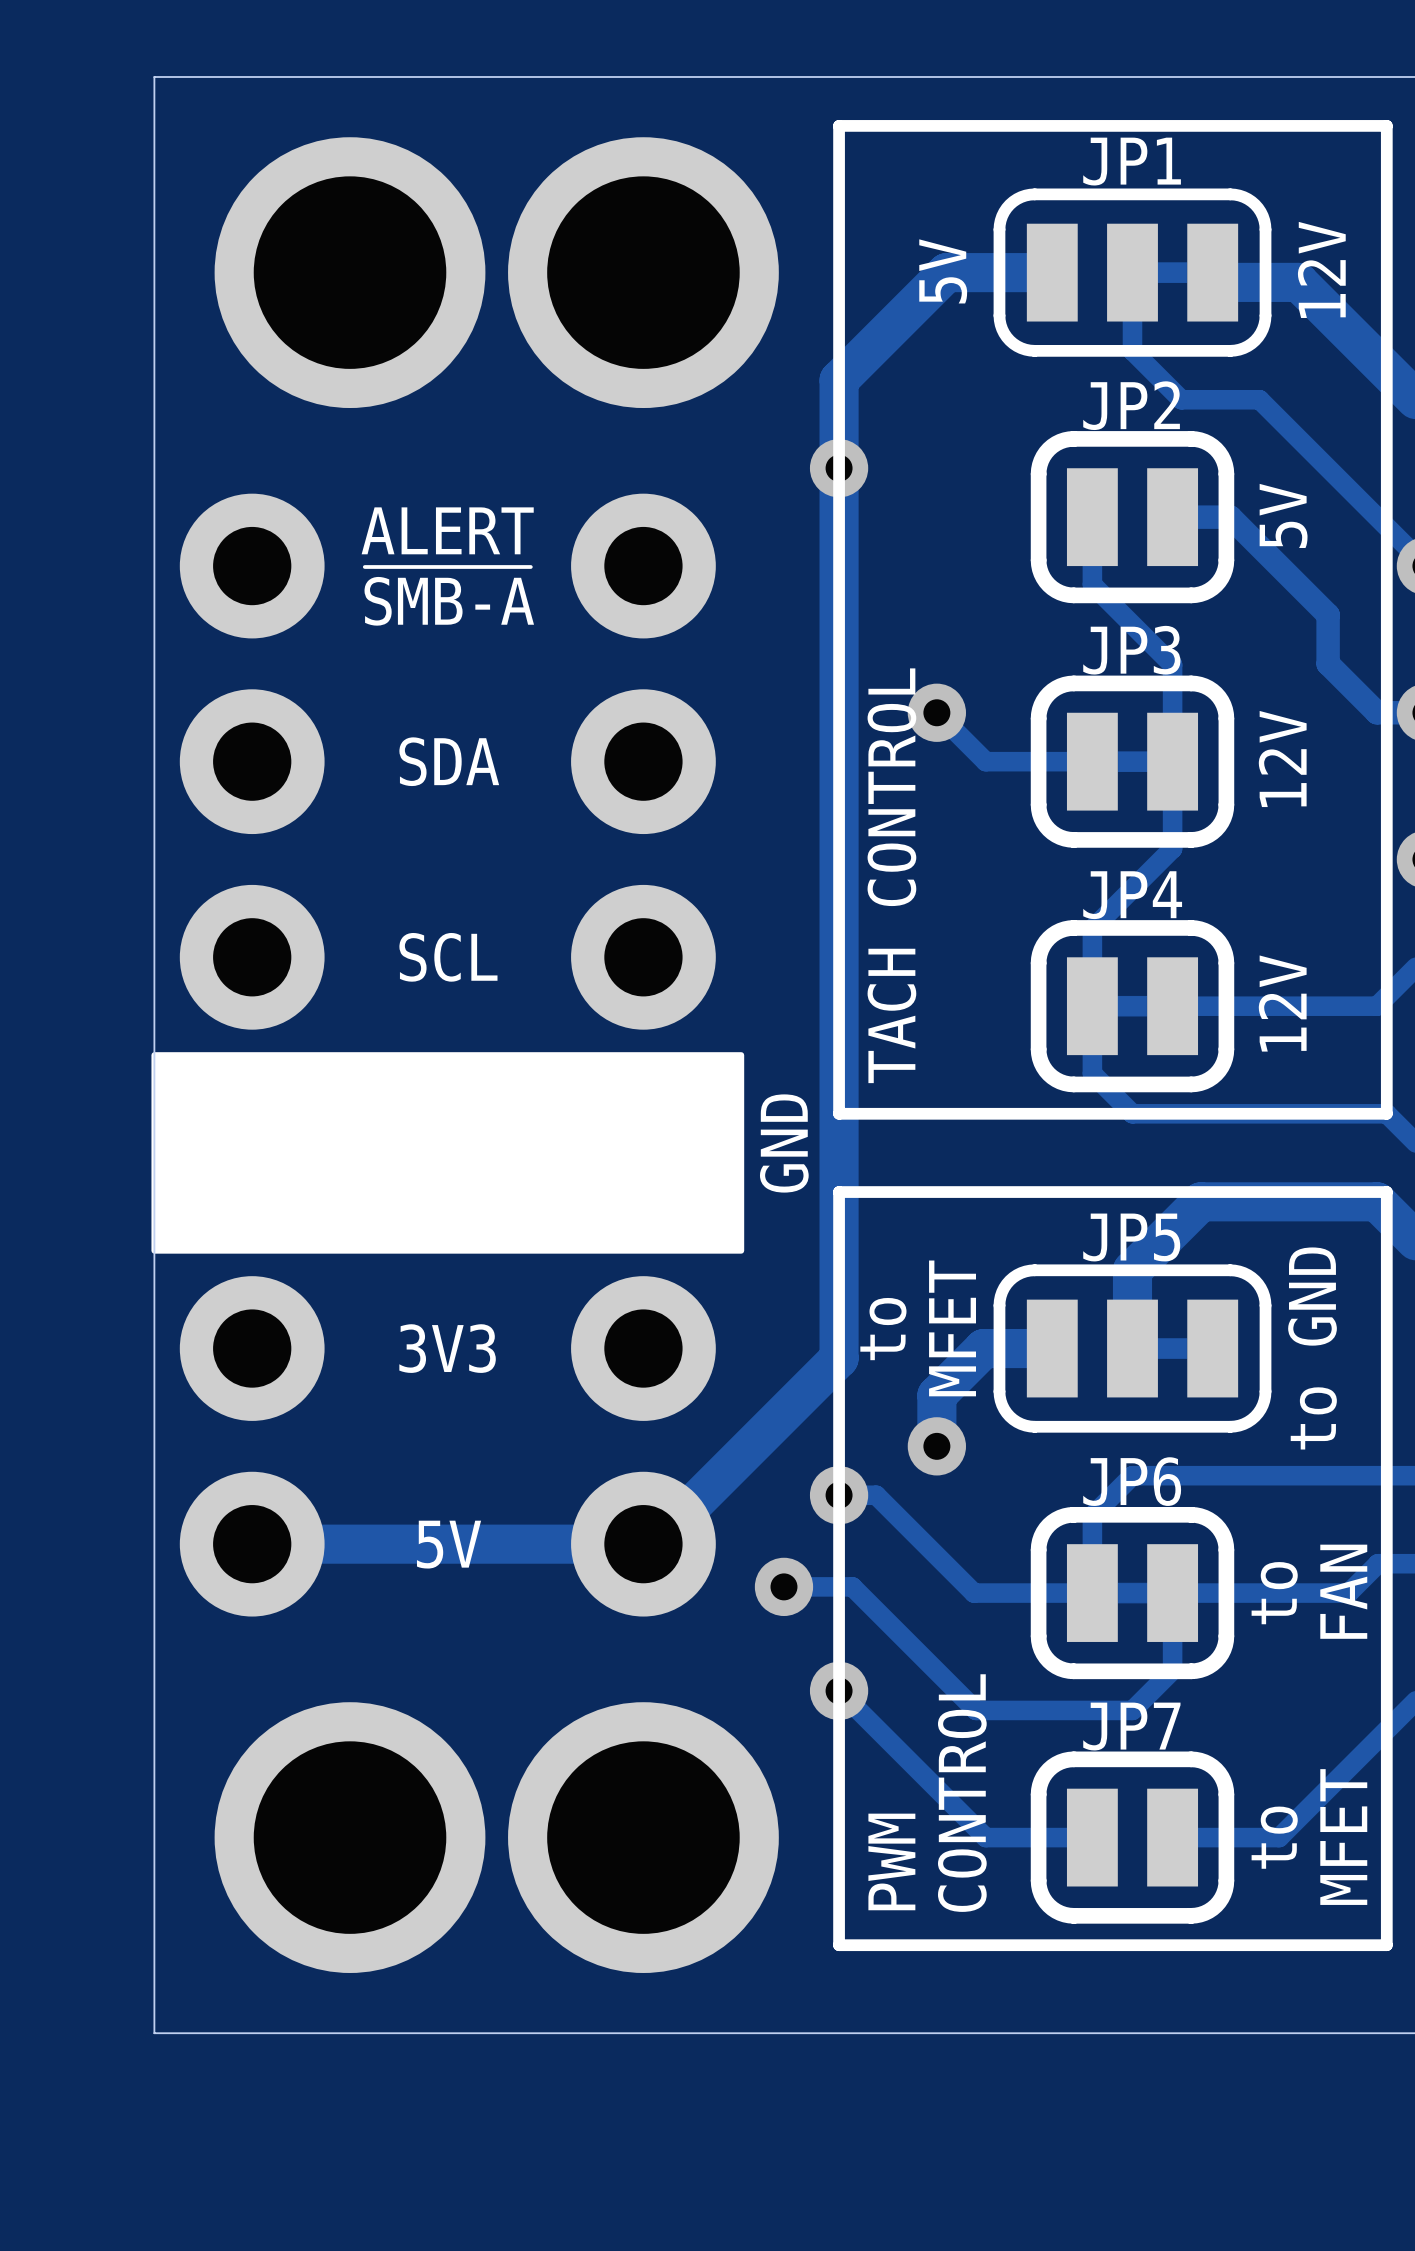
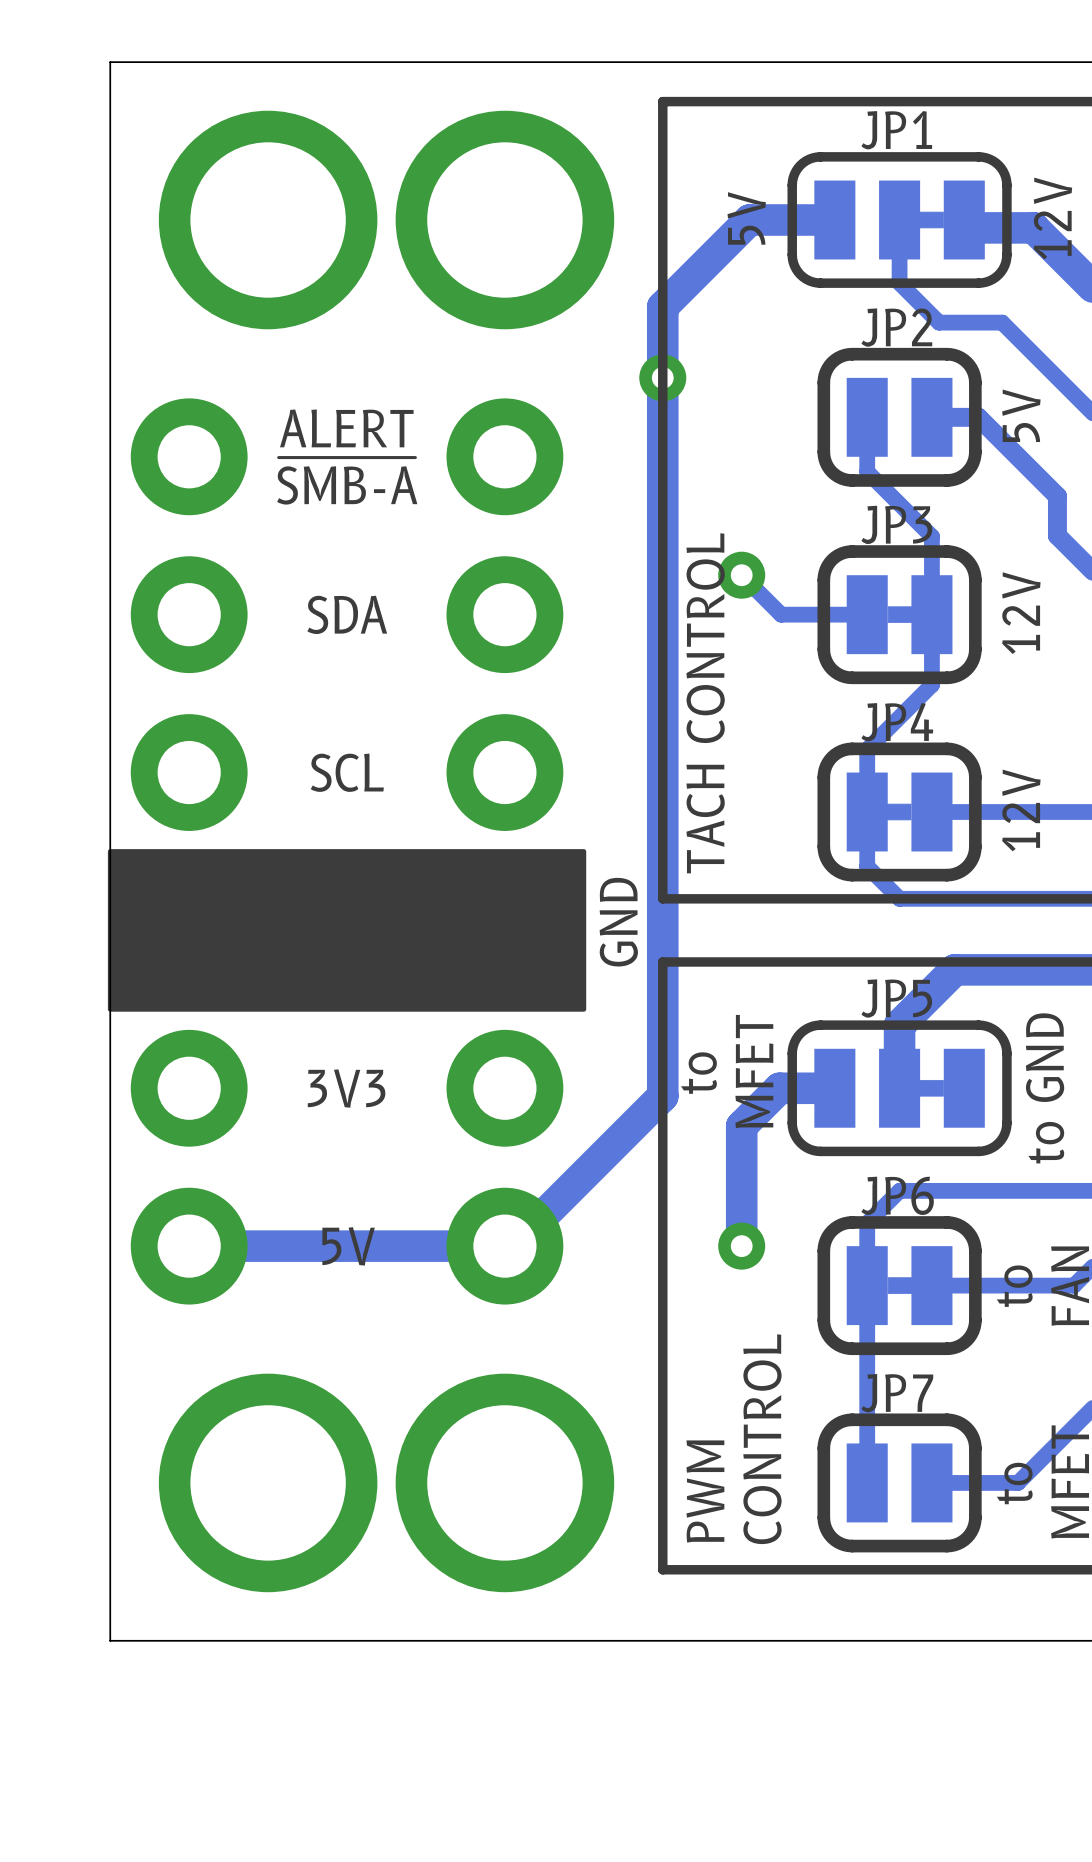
track: none -> (741, 1167) (741, 1246)
via: (936, 1446) -> none
track: (839, 1495) (876, 1495) (974, 1593) (1092, 1593) -> none
via: (839, 1495) -> none
via: none -> (741, 1246)
track: (783, 1586) (852, 1586) (976, 1710) (1132, 1710) (1172, 1670) (1172, 1593) -> none
via: (783, 1586) -> none
track: (839, 1690) (985, 1837) (1092, 1837) -> (867, 1285) (867, 1482)
via: (839, 1690) -> none

